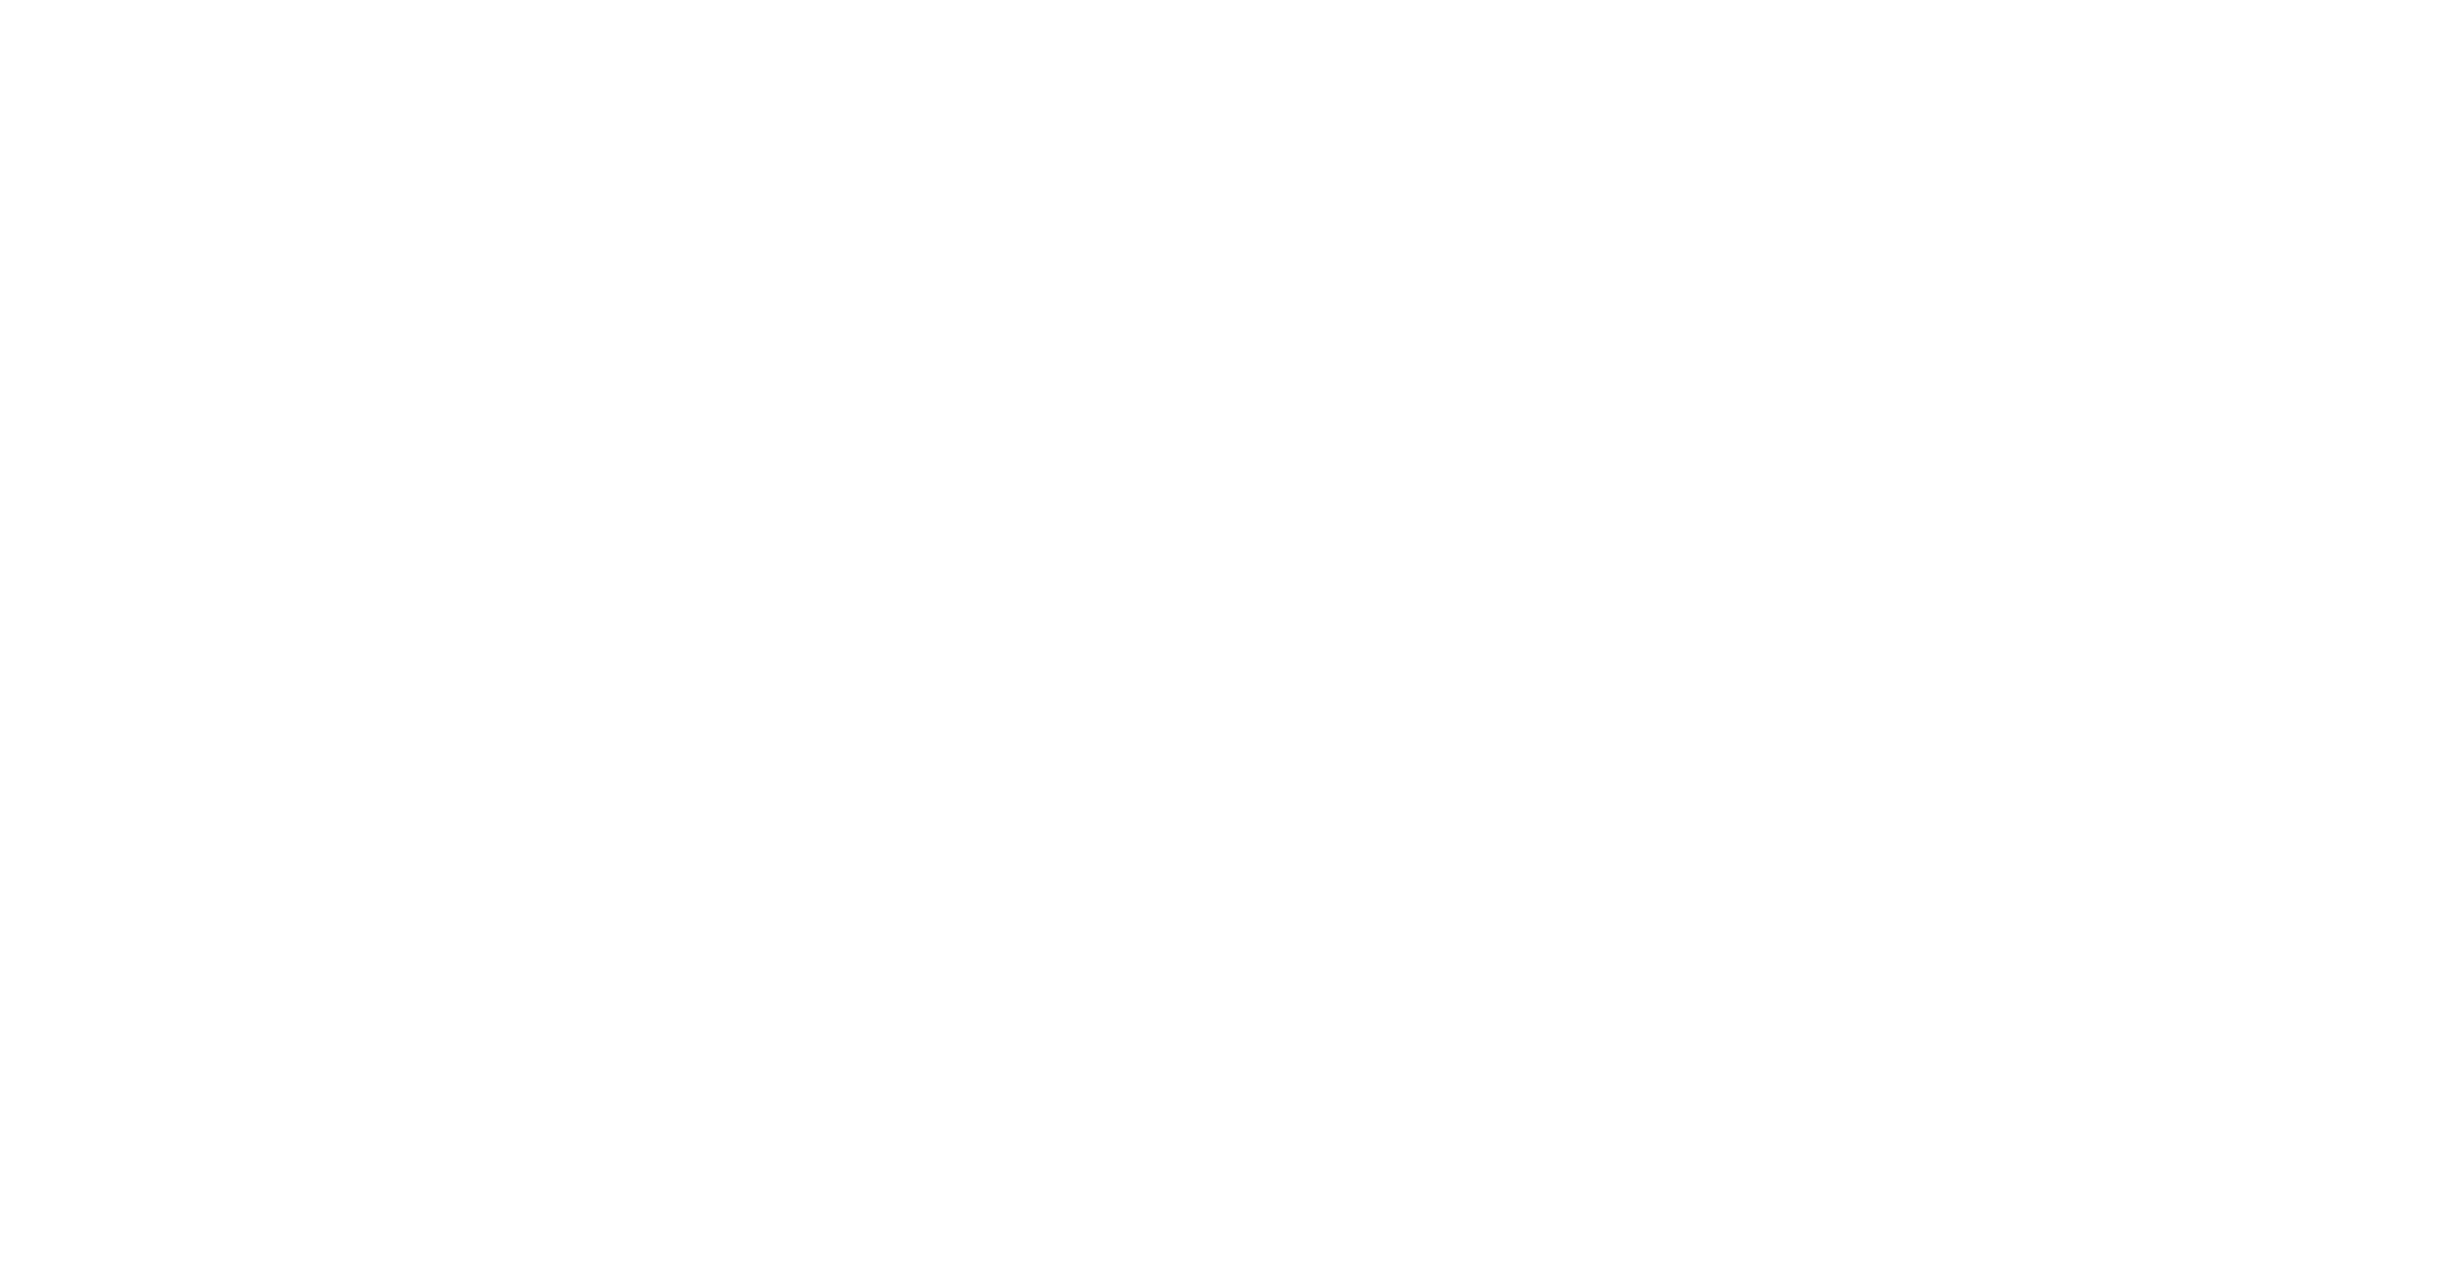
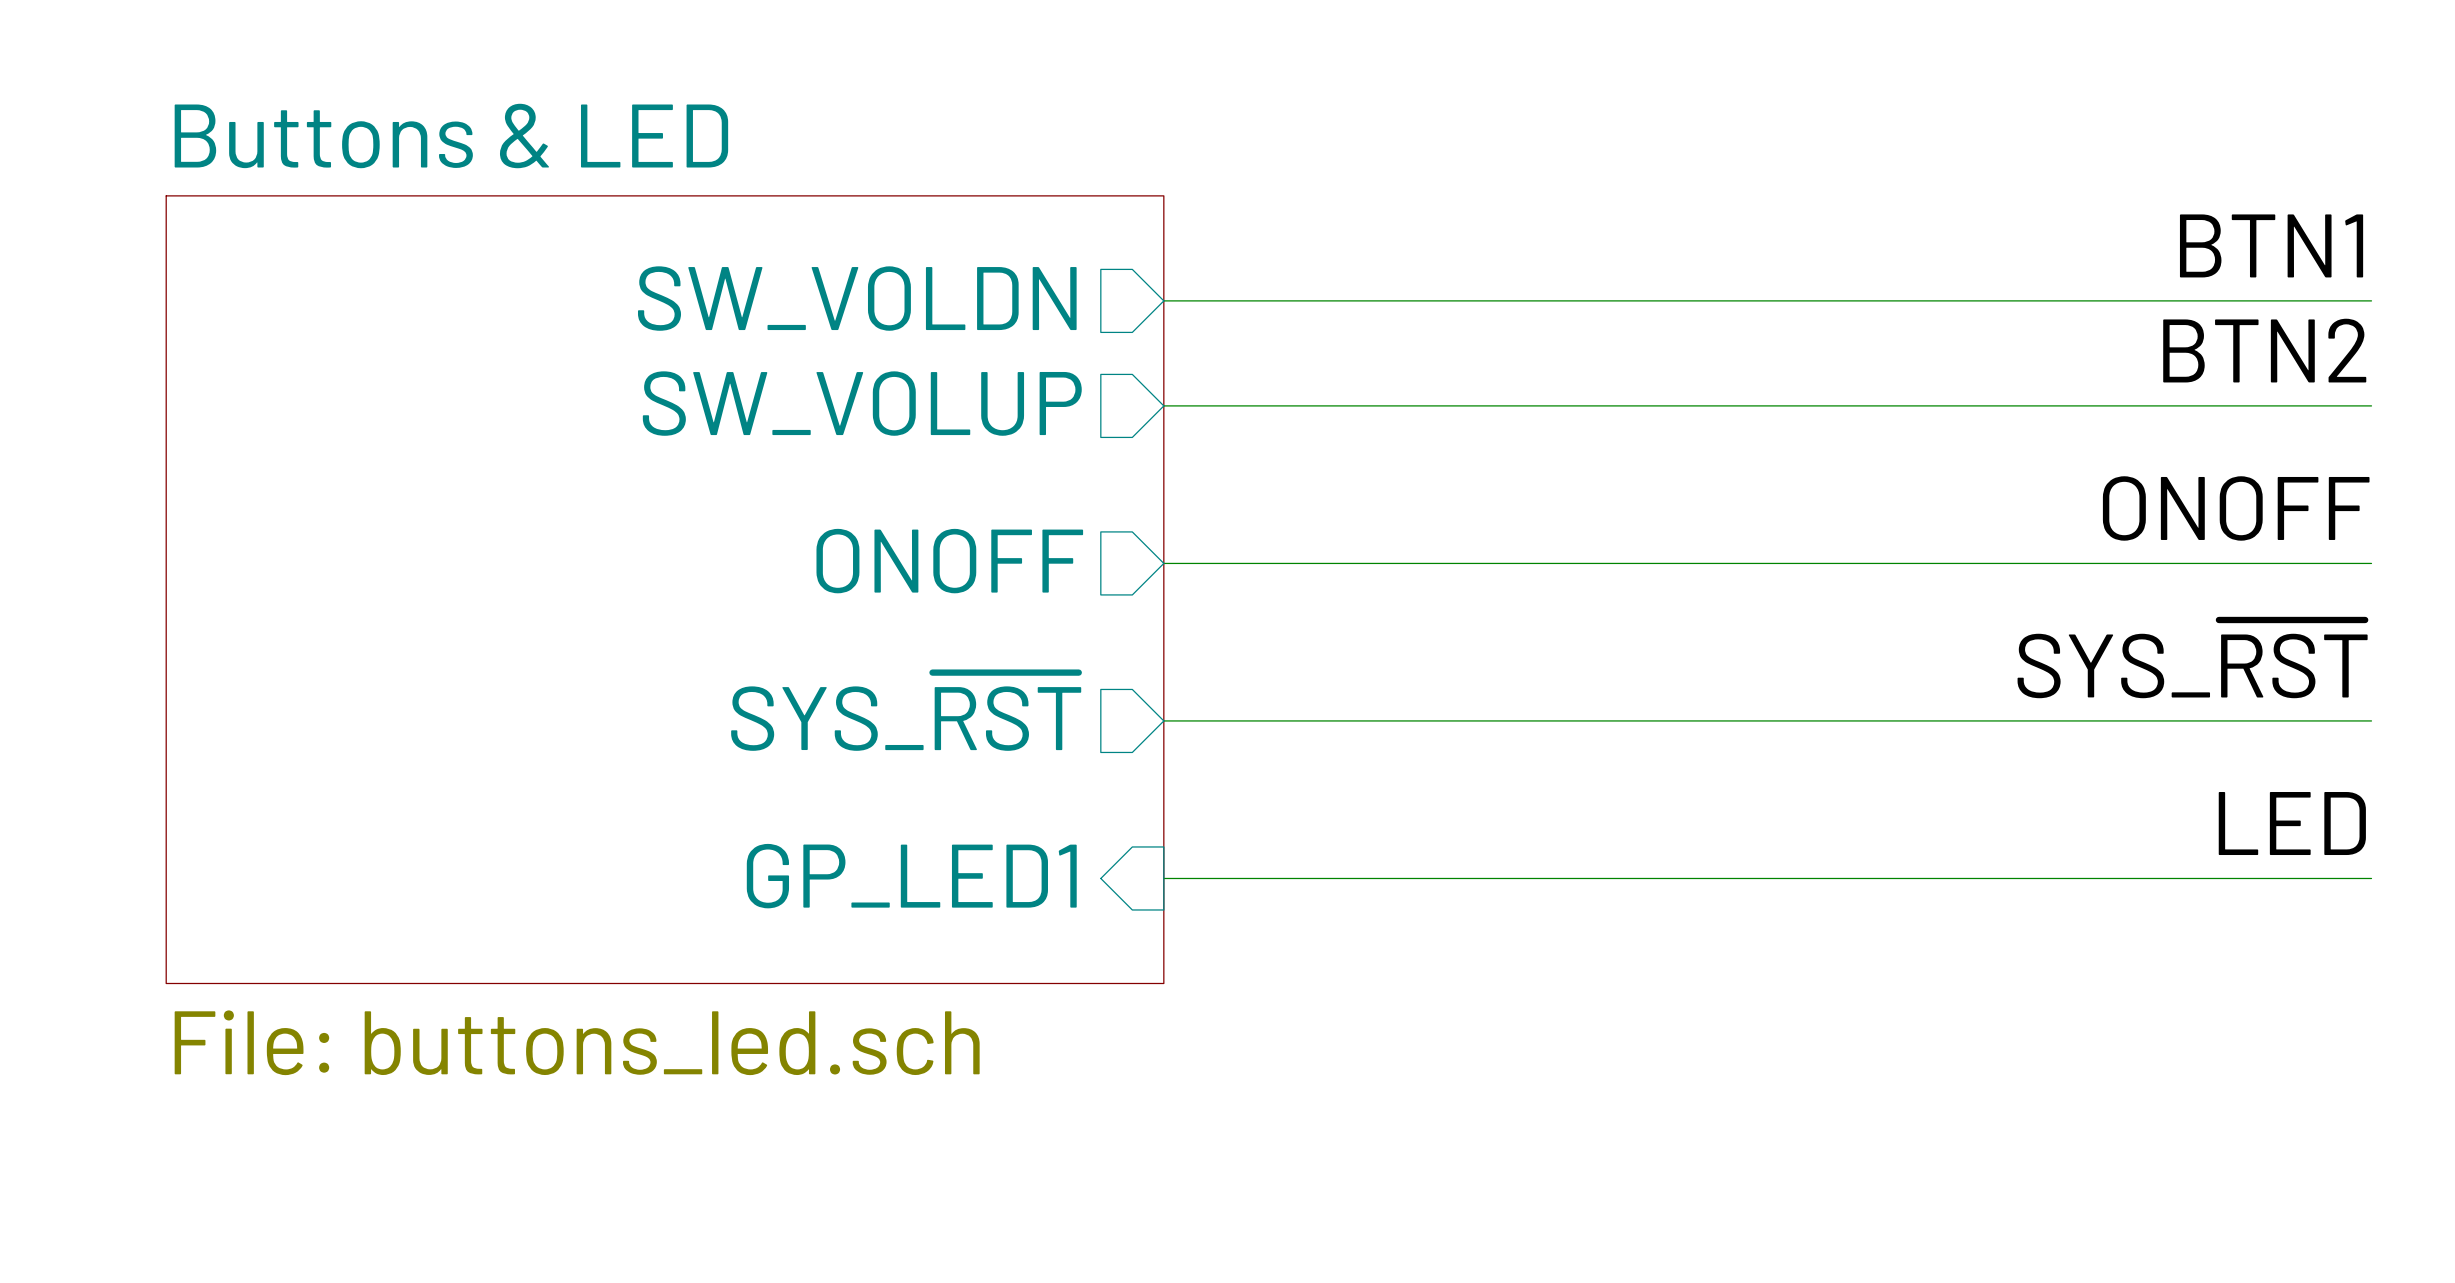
label: none -> BTN1 (2271, 245)
sheet pin: none -> SW_VOLDN (857, 298)
wire: none -> (1163, 300) (2371, 300)
label: none -> BTN2 (2264, 350)
sheet pin: none -> SW_VOLUP (862, 403)
wire: none -> (1163, 405) (2371, 405)
label: none -> ONOFF (2236, 508)
sheet pin: none -> ONOFF (949, 561)
wire: none -> (1163, 563) (2371, 563)
sheet Buttons & LED: none -> File: buttons_led.sch (665, 589)
label: none -> SYS_~{RST} (2192, 659)
sheet pin: none -> SYS_~{RST} (906, 711)
wire: none -> (1163, 720) (2371, 720)
label: none -> LED (2292, 823)
sheet pin: none -> GP_LED1 (911, 876)
wire: none -> (1163, 878) (2371, 878)

